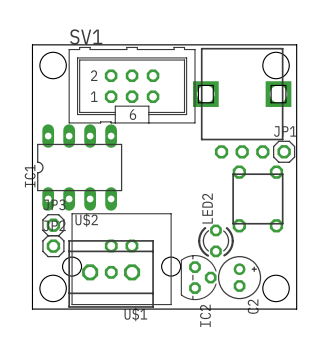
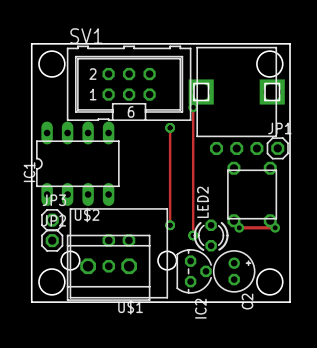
track: none -> (193, 107) (193, 235)
via: none -> (193, 107)
track: none -> (170, 127) (170, 225)
via: none -> (170, 127)
via: none -> (170, 225)
track: none -> (239, 227) (275, 227)
via: none -> (239, 227)
via: none -> (275, 227)
via: none -> (193, 235)

